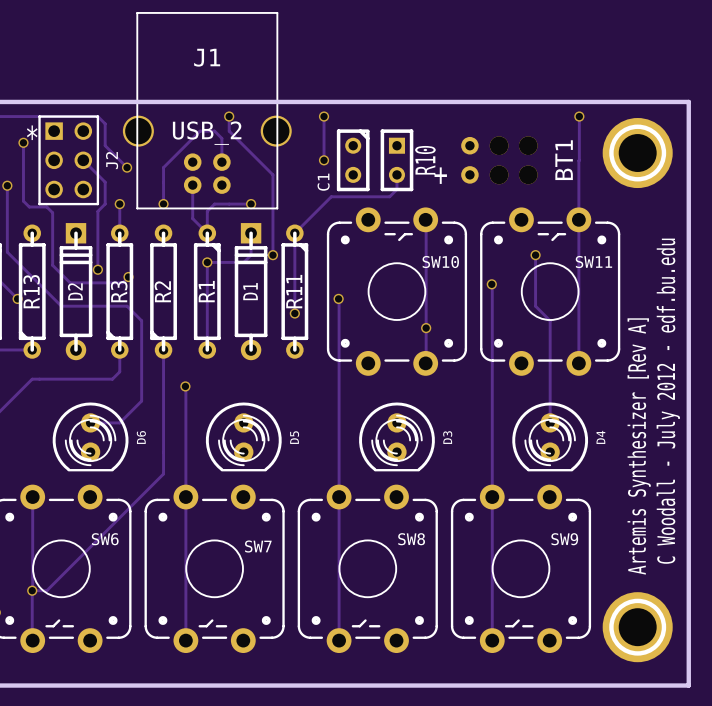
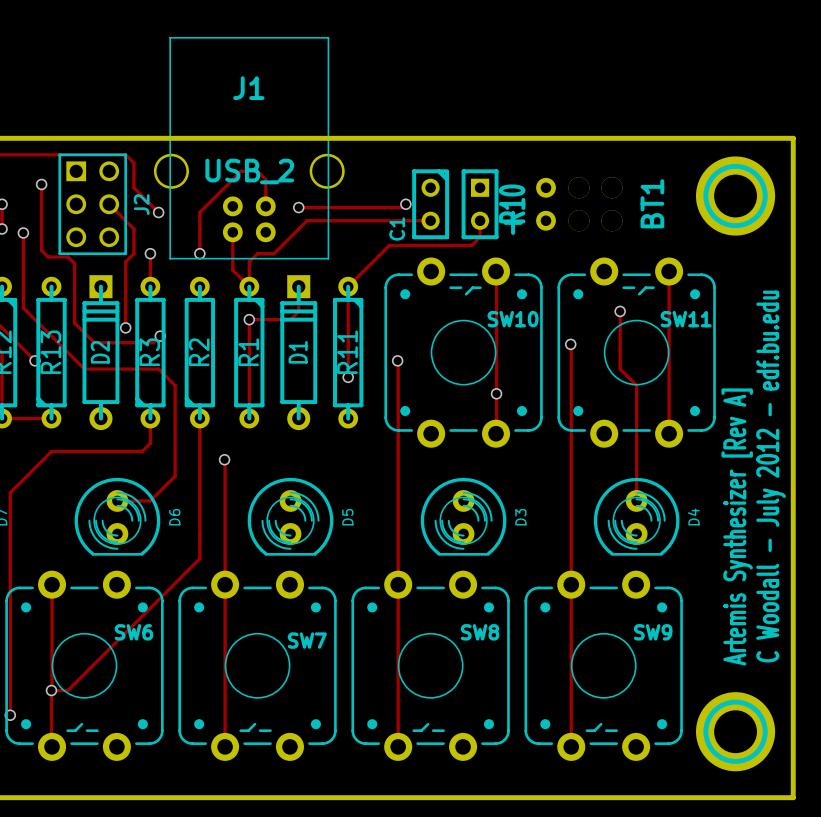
track: (229, 116) (229, 131) (272, 174) (272, 255) -> none
via: (229, 116) -> none
track: (324, 116) (324, 160) -> none
via: (324, 116) -> none
track: (579, 116) (578, 219) -> none
via: (579, 116) -> none
text: * (32, 132) -> none
via: (324, 160) -> none
track: none -> (405, 204) (402, 207) (298, 207)
via: none -> (405, 204)
C1 position: (353, 160) -> (430, 204)
R10 position: (396, 160) -> (480, 204)
via: none -> (298, 207)
track: (396, 174) (396, 189) (389, 196) -> (480, 220) (480, 237) (471, 245) (455, 245)
track: (229, 204) (251, 204) -> (274, 253) (306, 220) (430, 220)
via: (251, 204) -> none
via: (272, 255) -> none

